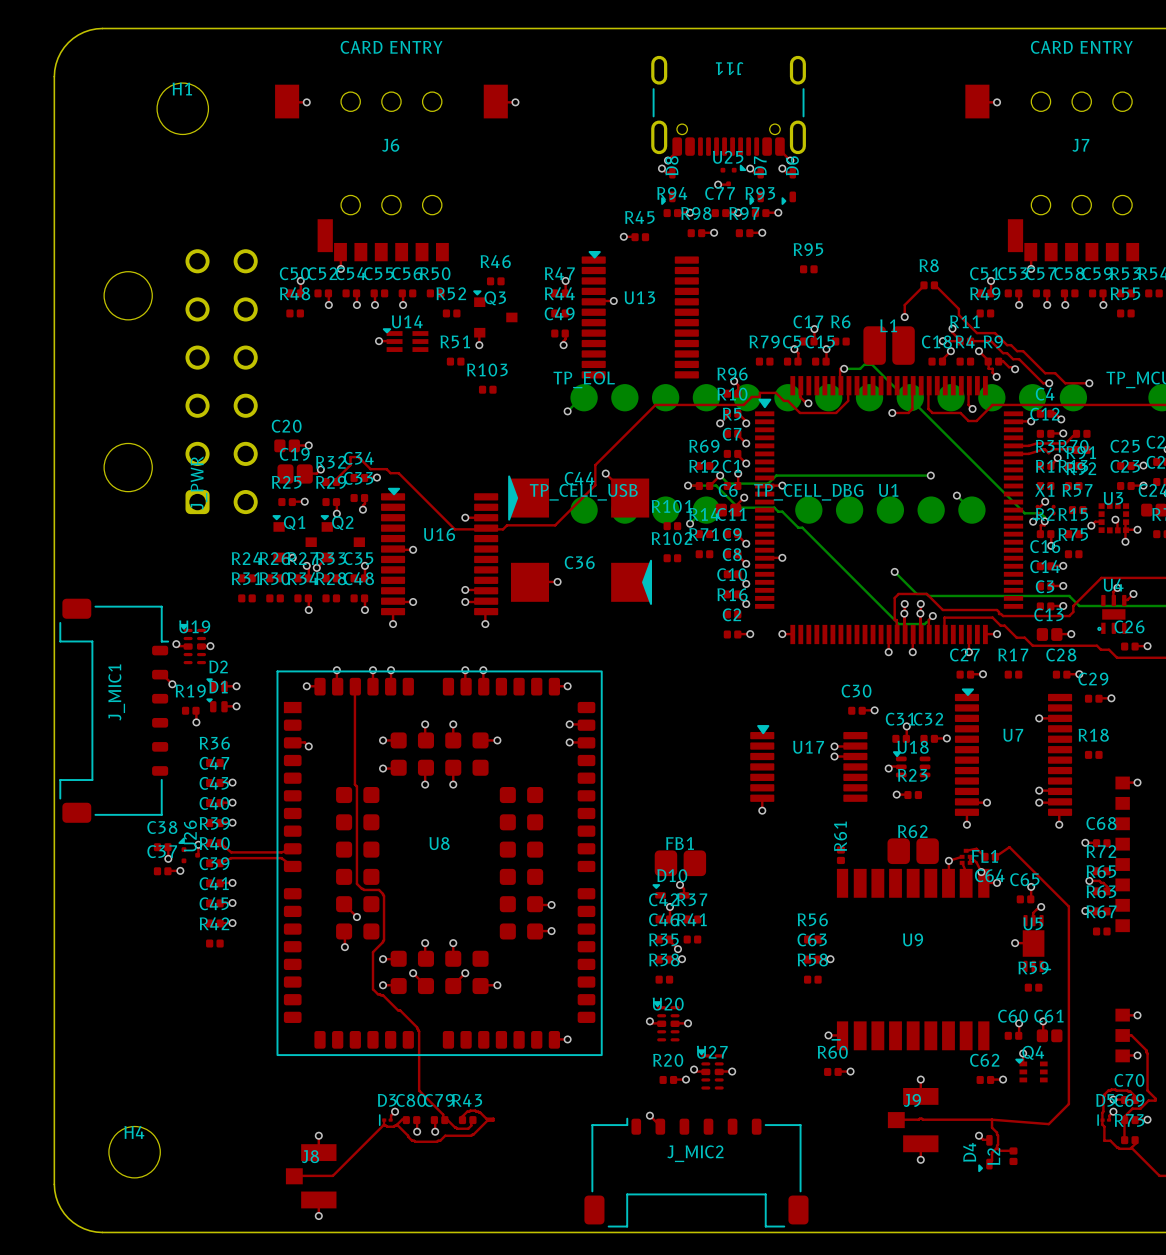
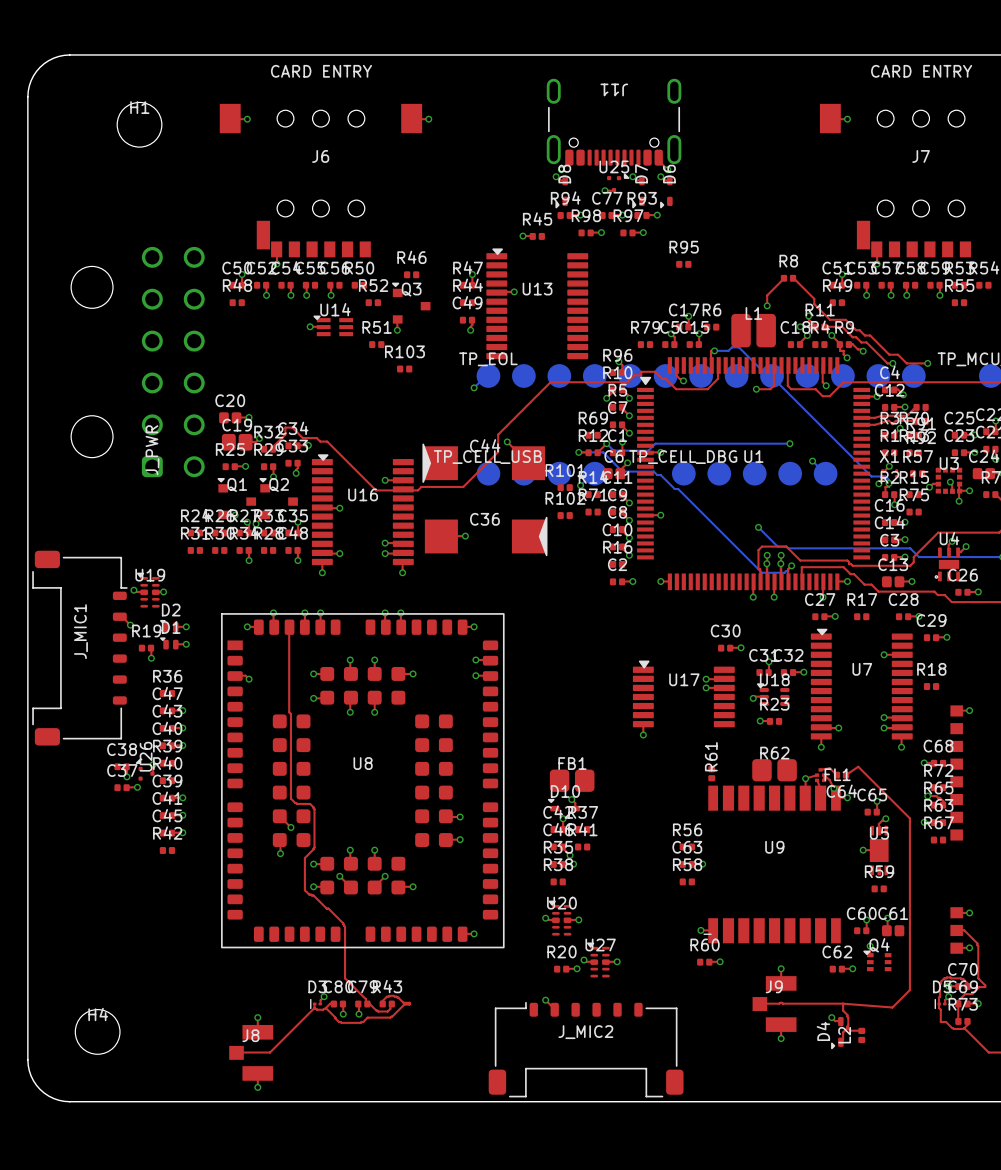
top track: (220, 843) (231, 852) (281, 852) (292, 848) -> none
top track: (220, 863) (231, 858) (281, 858) (292, 866) -> none

